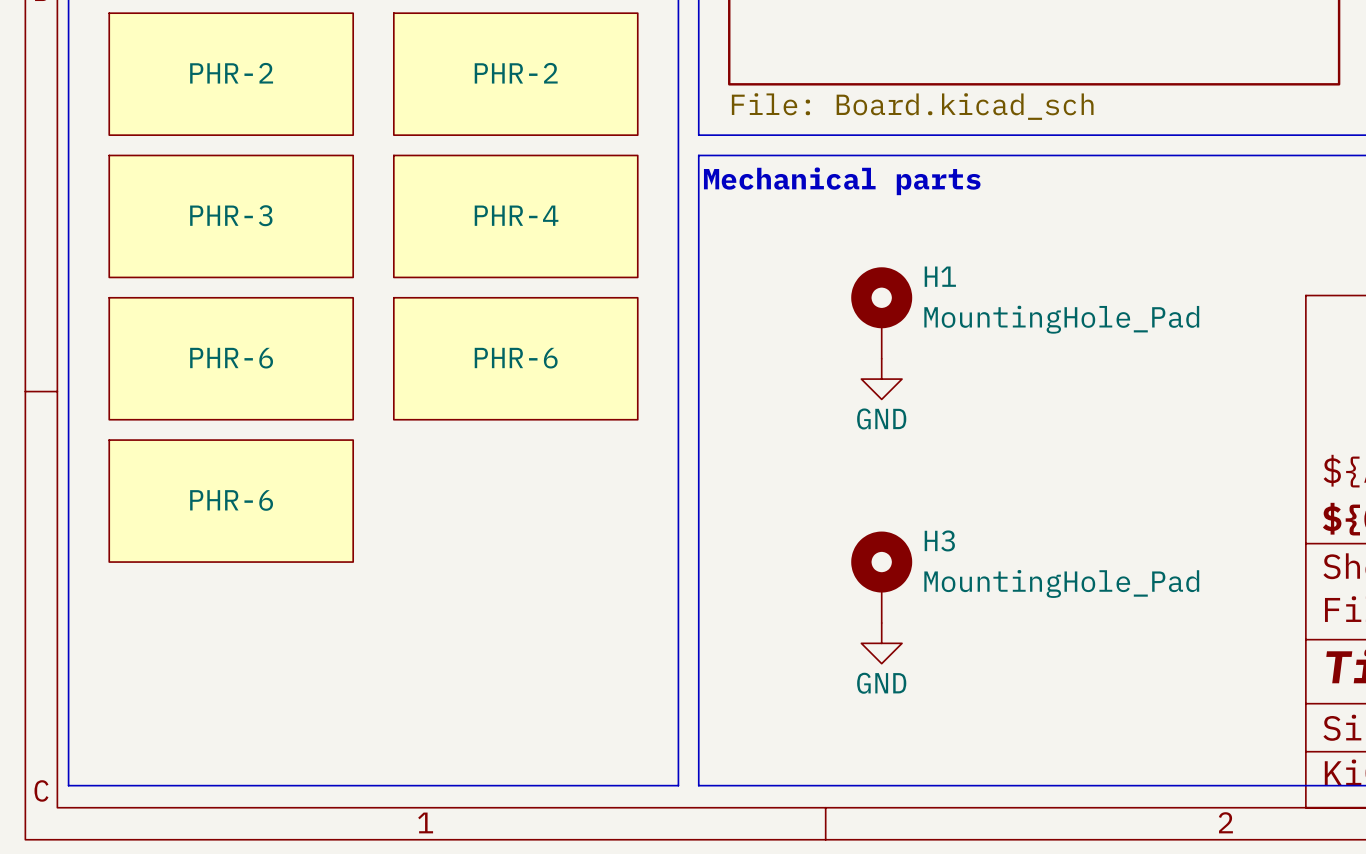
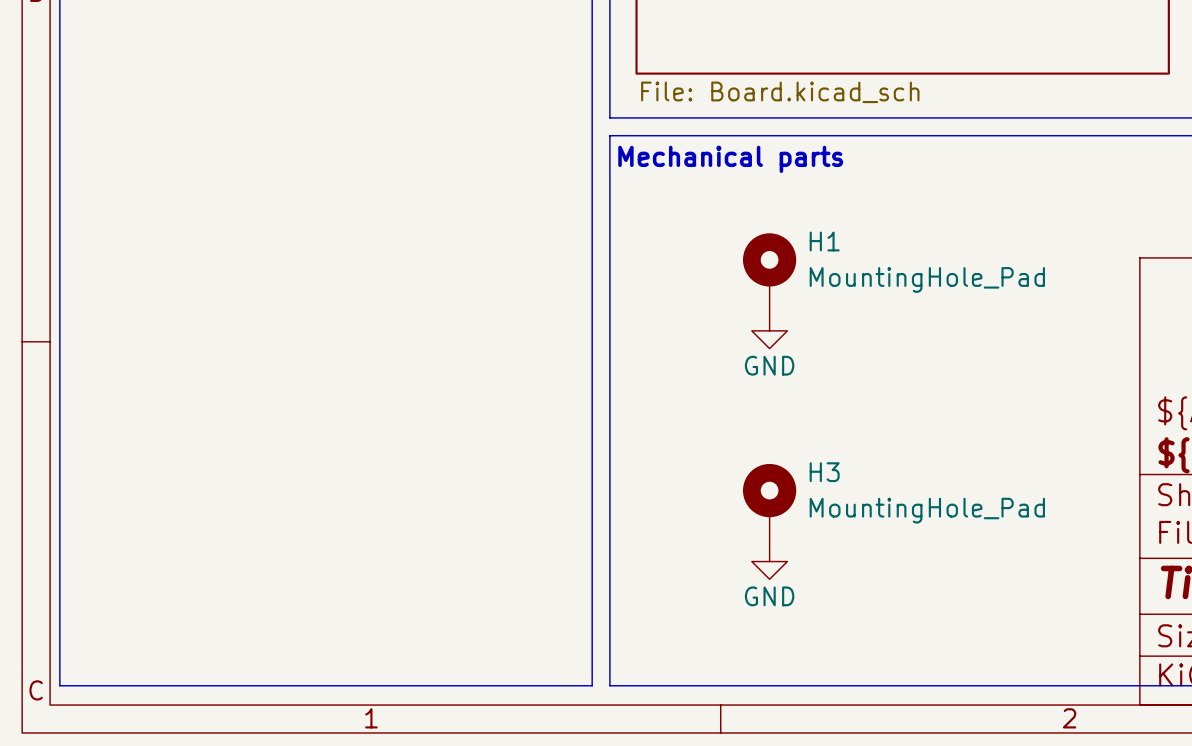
part: PHR-2 (231, 74) -> none
part: PHR-2 (515, 74) -> none
part: PHR-3 (231, 216) -> none
part: PHR-4 (515, 216) -> none
part: PHR-6 (231, 358) -> none
part: PHR-6 (515, 358) -> none
part: PHR-6 (231, 501) -> none

